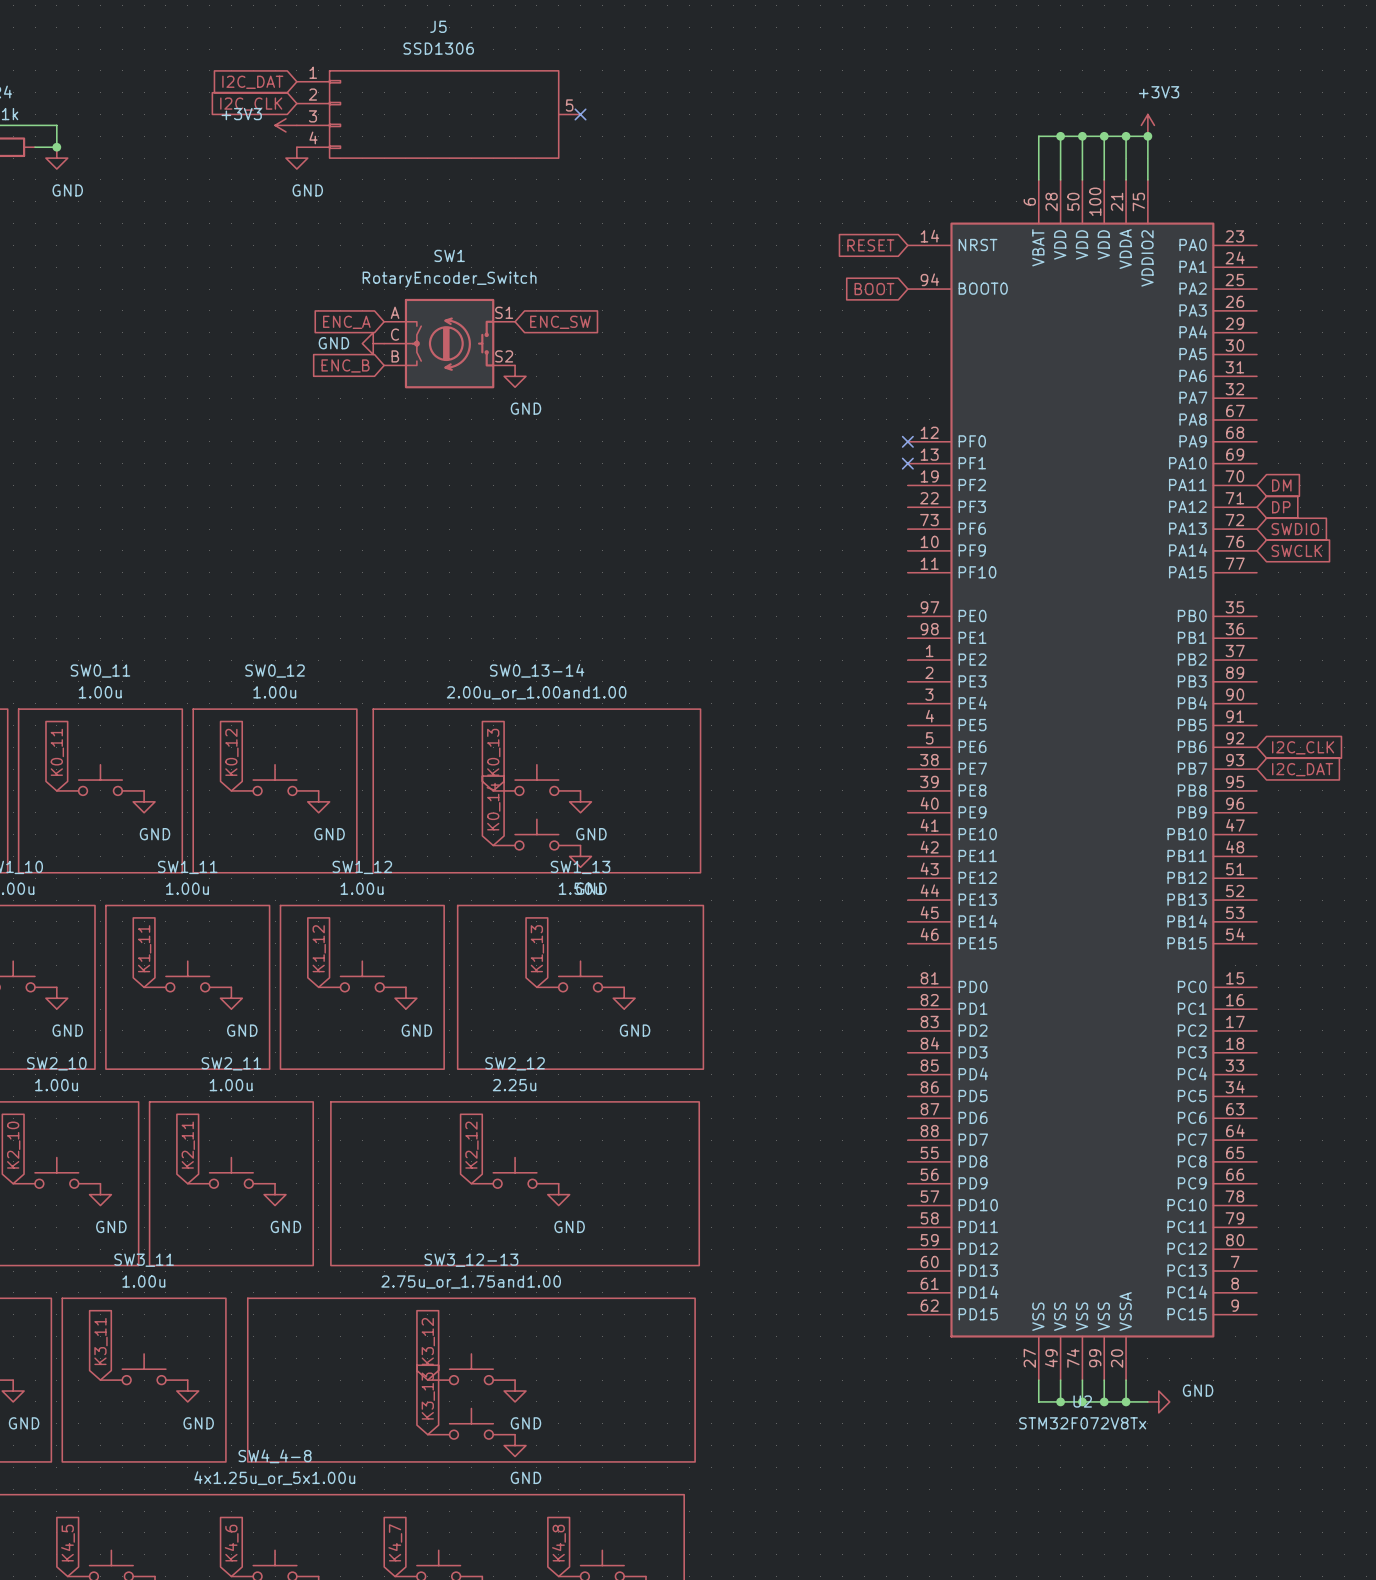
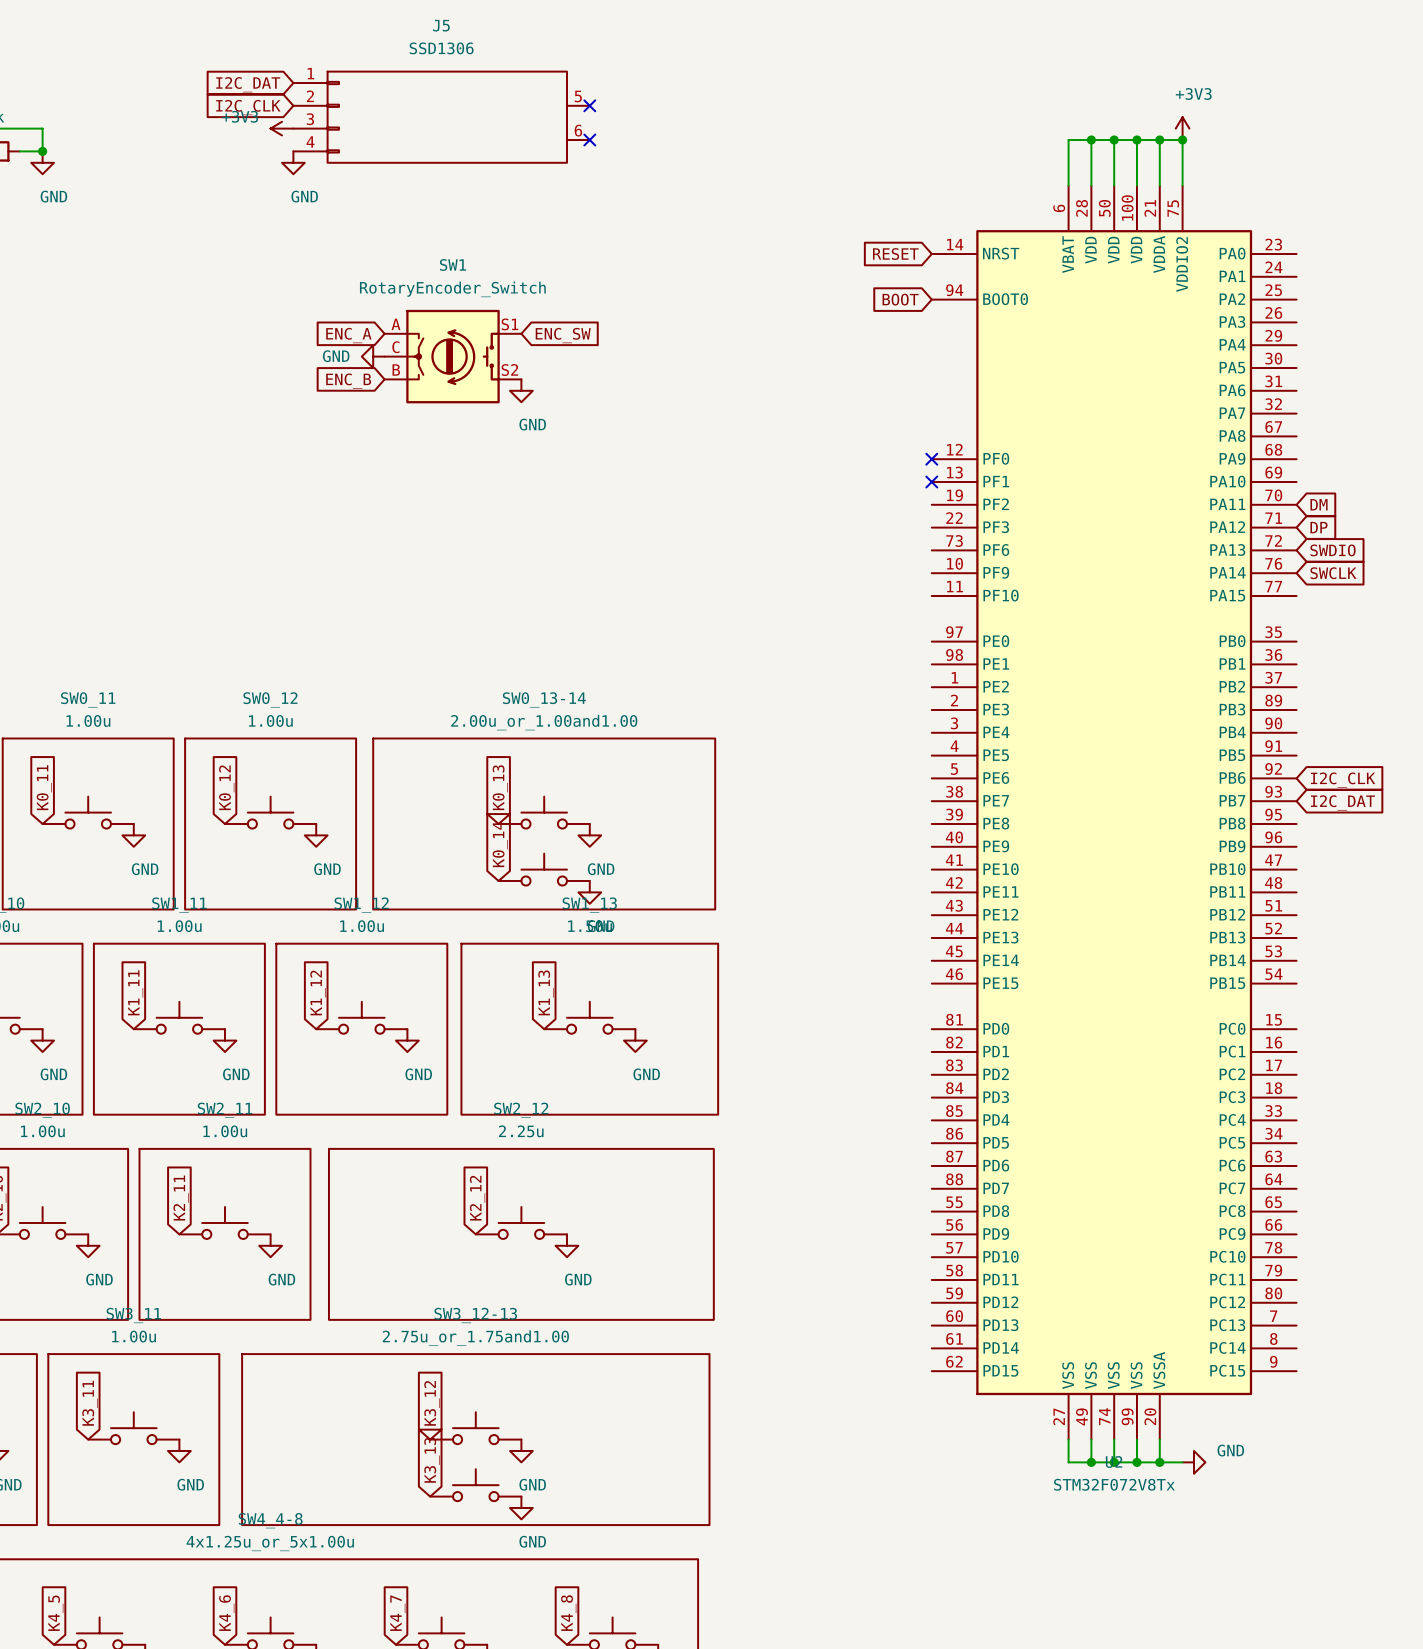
J5 symbol: [296, 70, 581, 159] -> [293, 71, 590, 163]
no-connect mark: none -> (589, 105)
no-connect mark: (580, 114) -> none
no-connect mark: none -> (589, 140)

